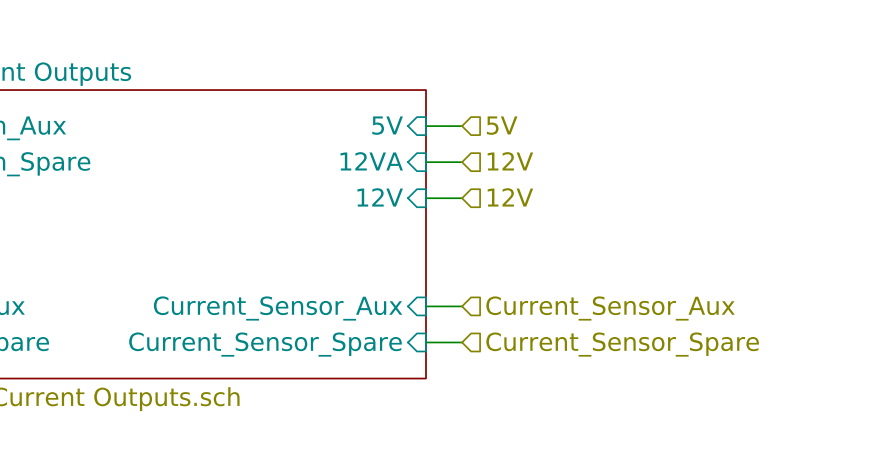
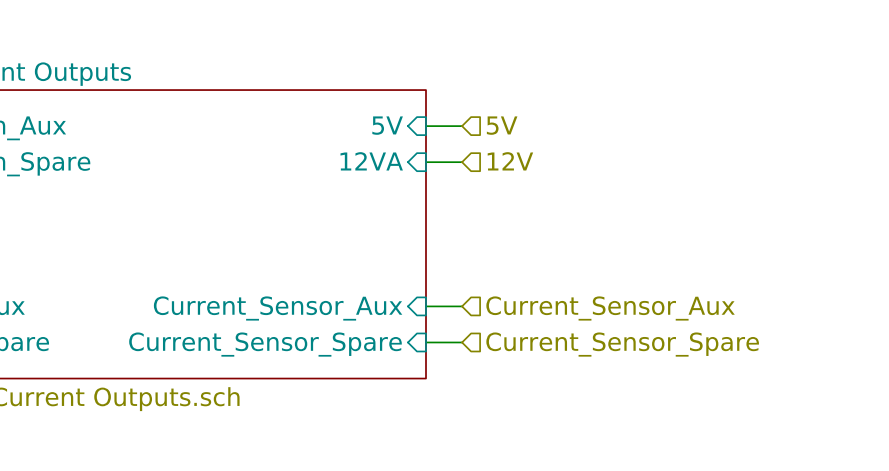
sheet pin: 12V (380, 197) -> none
hierarchical label: 12V (510, 197) -> none
wire: (426, 198) (462, 198) -> none

